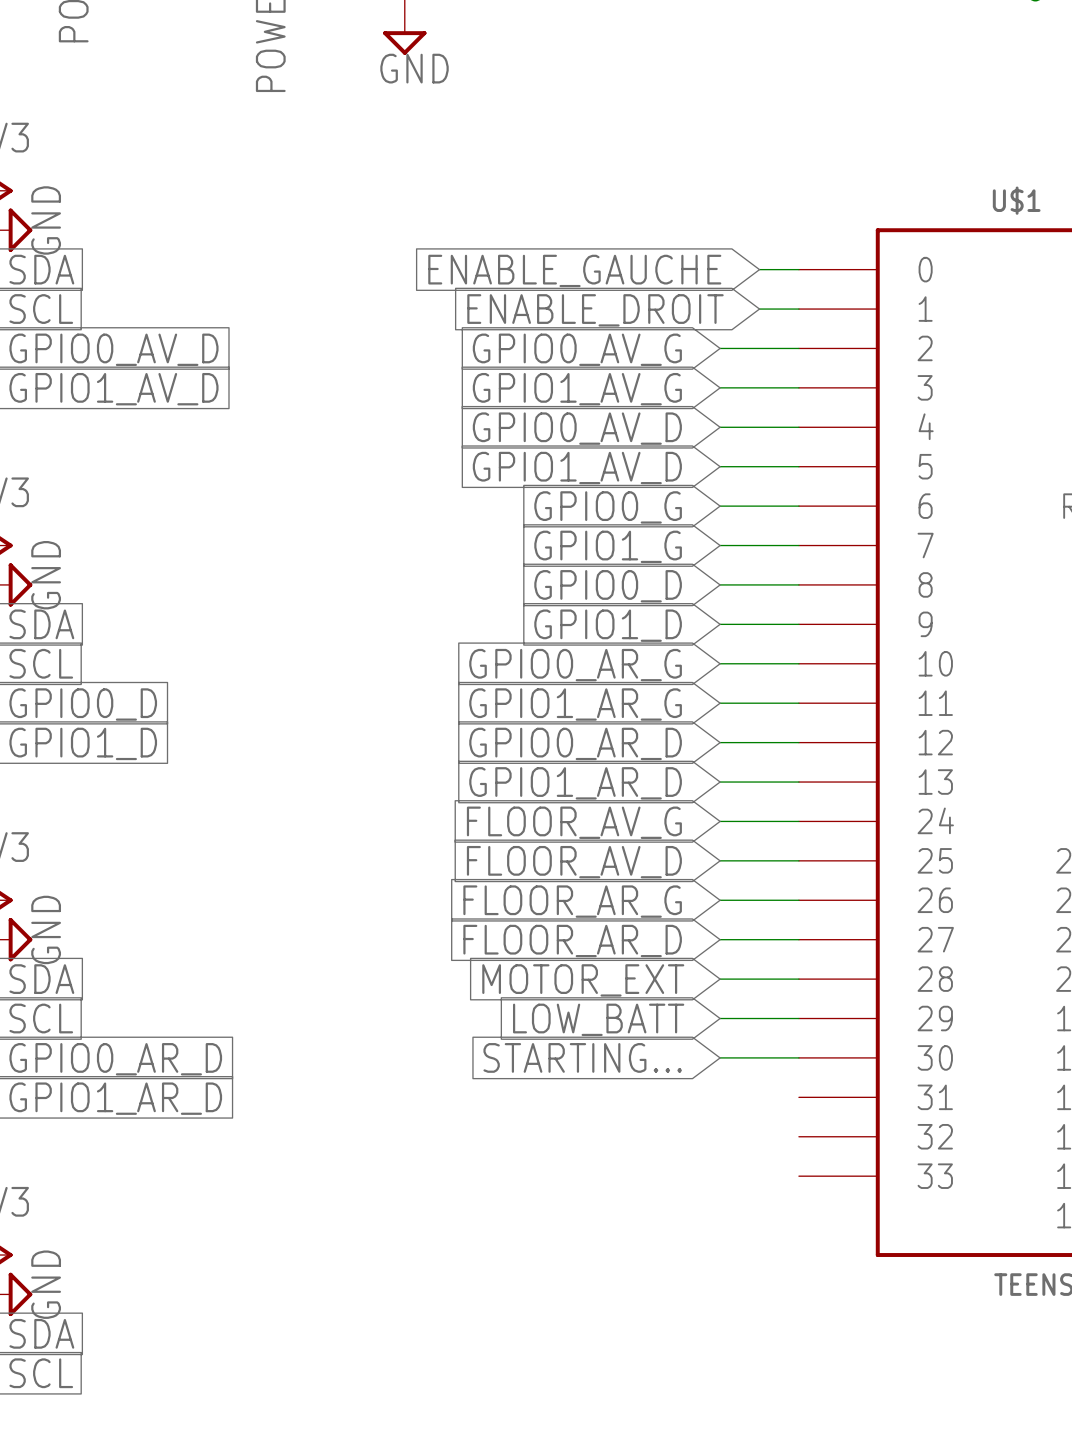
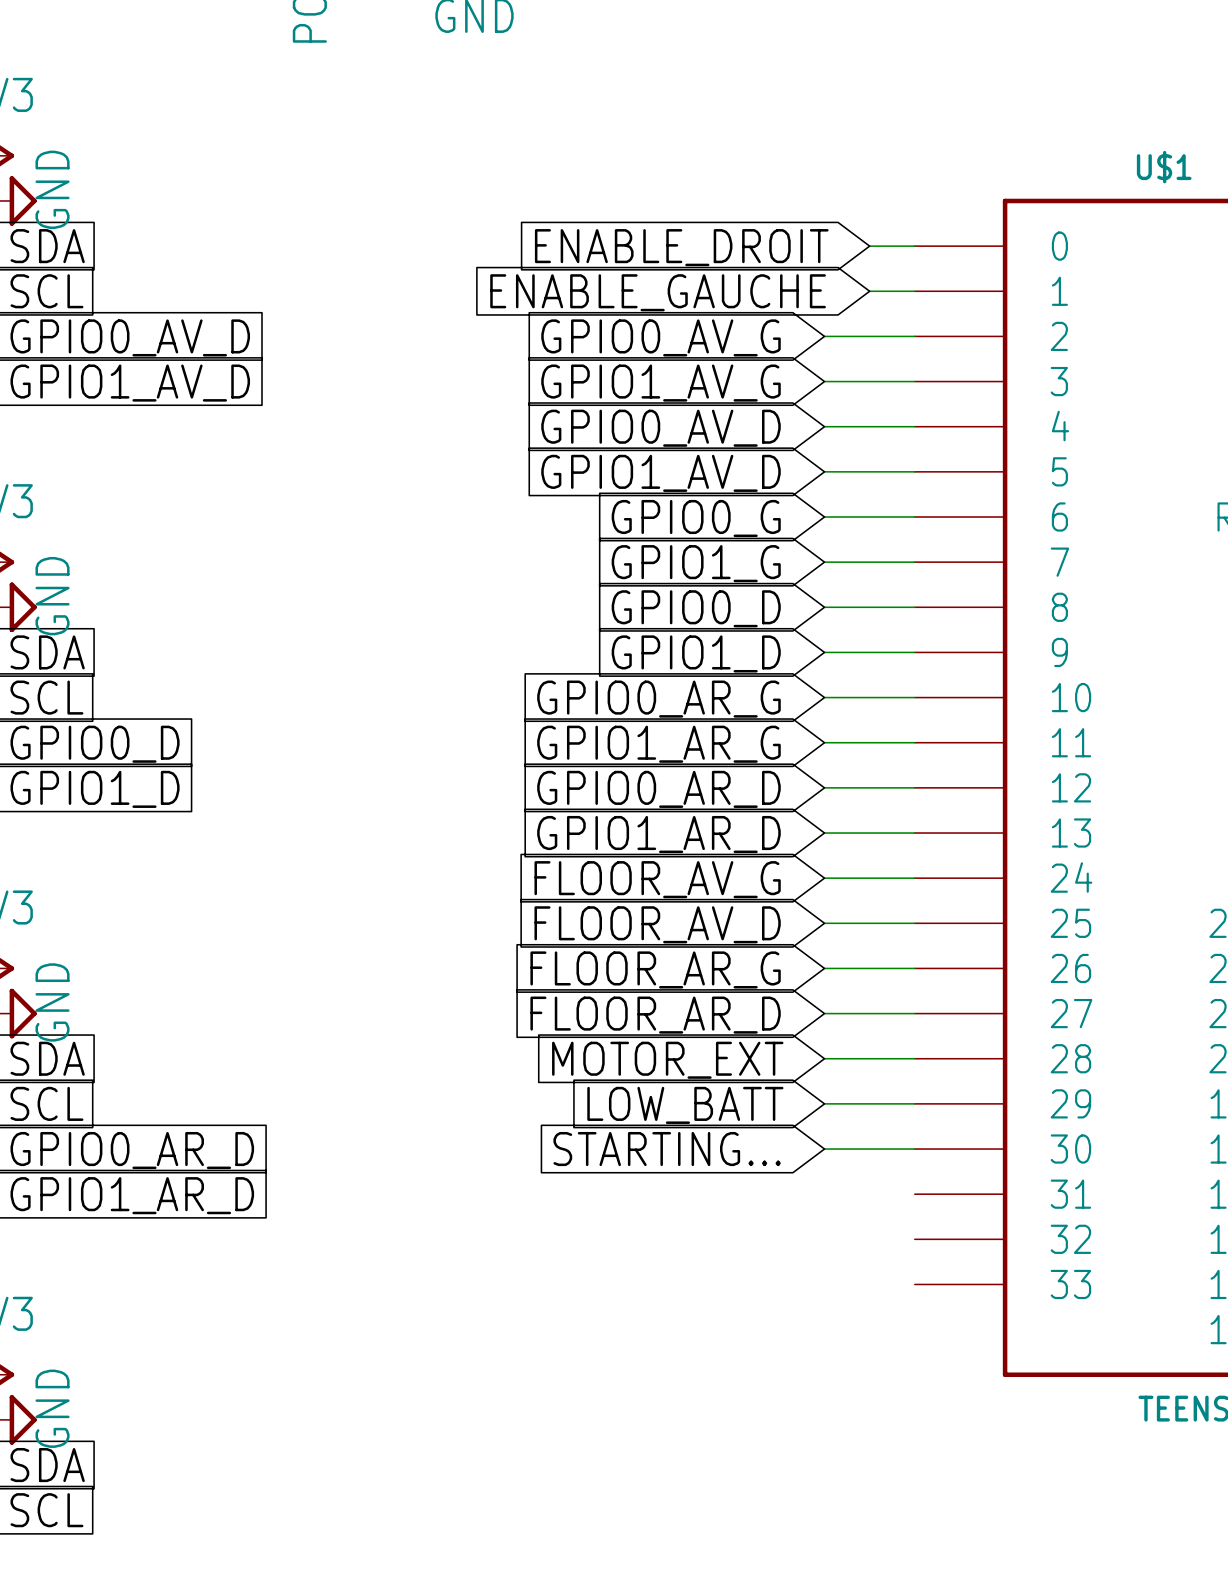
global label: ENABLE_GAUCHE (574, 270) -> ENABLE_DROIT (681, 247)
global label: ENABLE_DROIT (595, 310) -> ENABLE_GAUCHE (658, 292)

